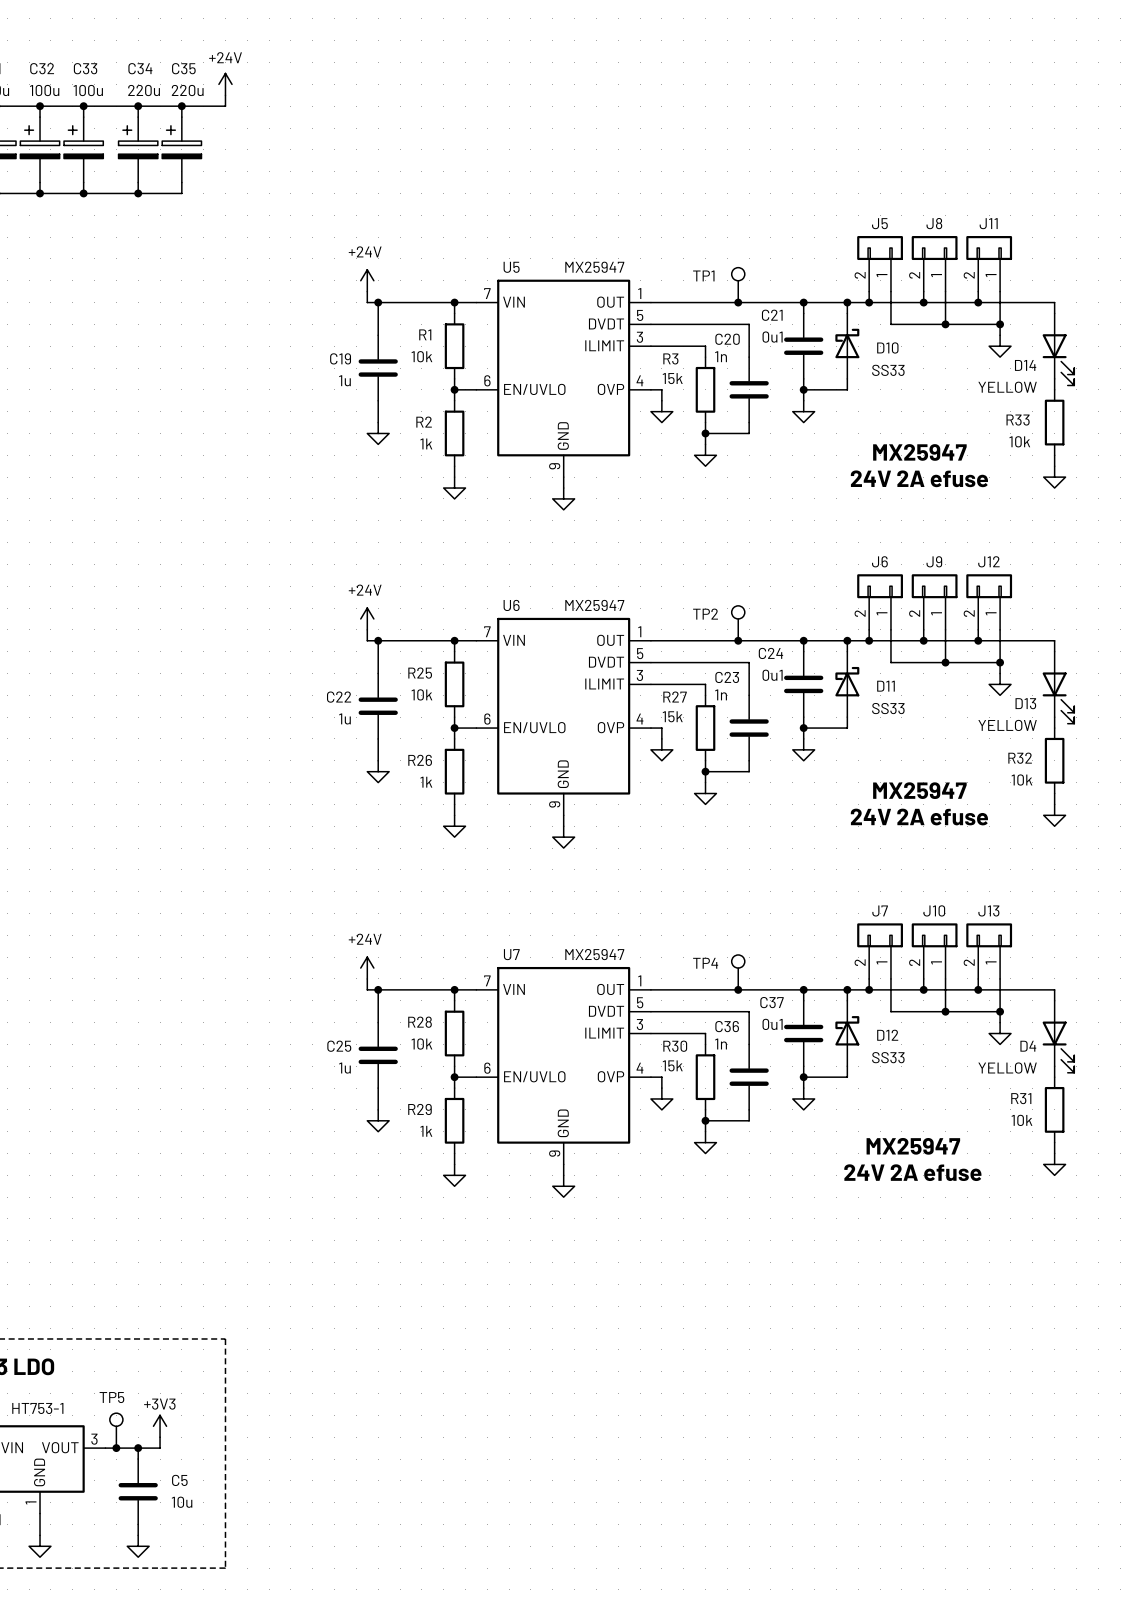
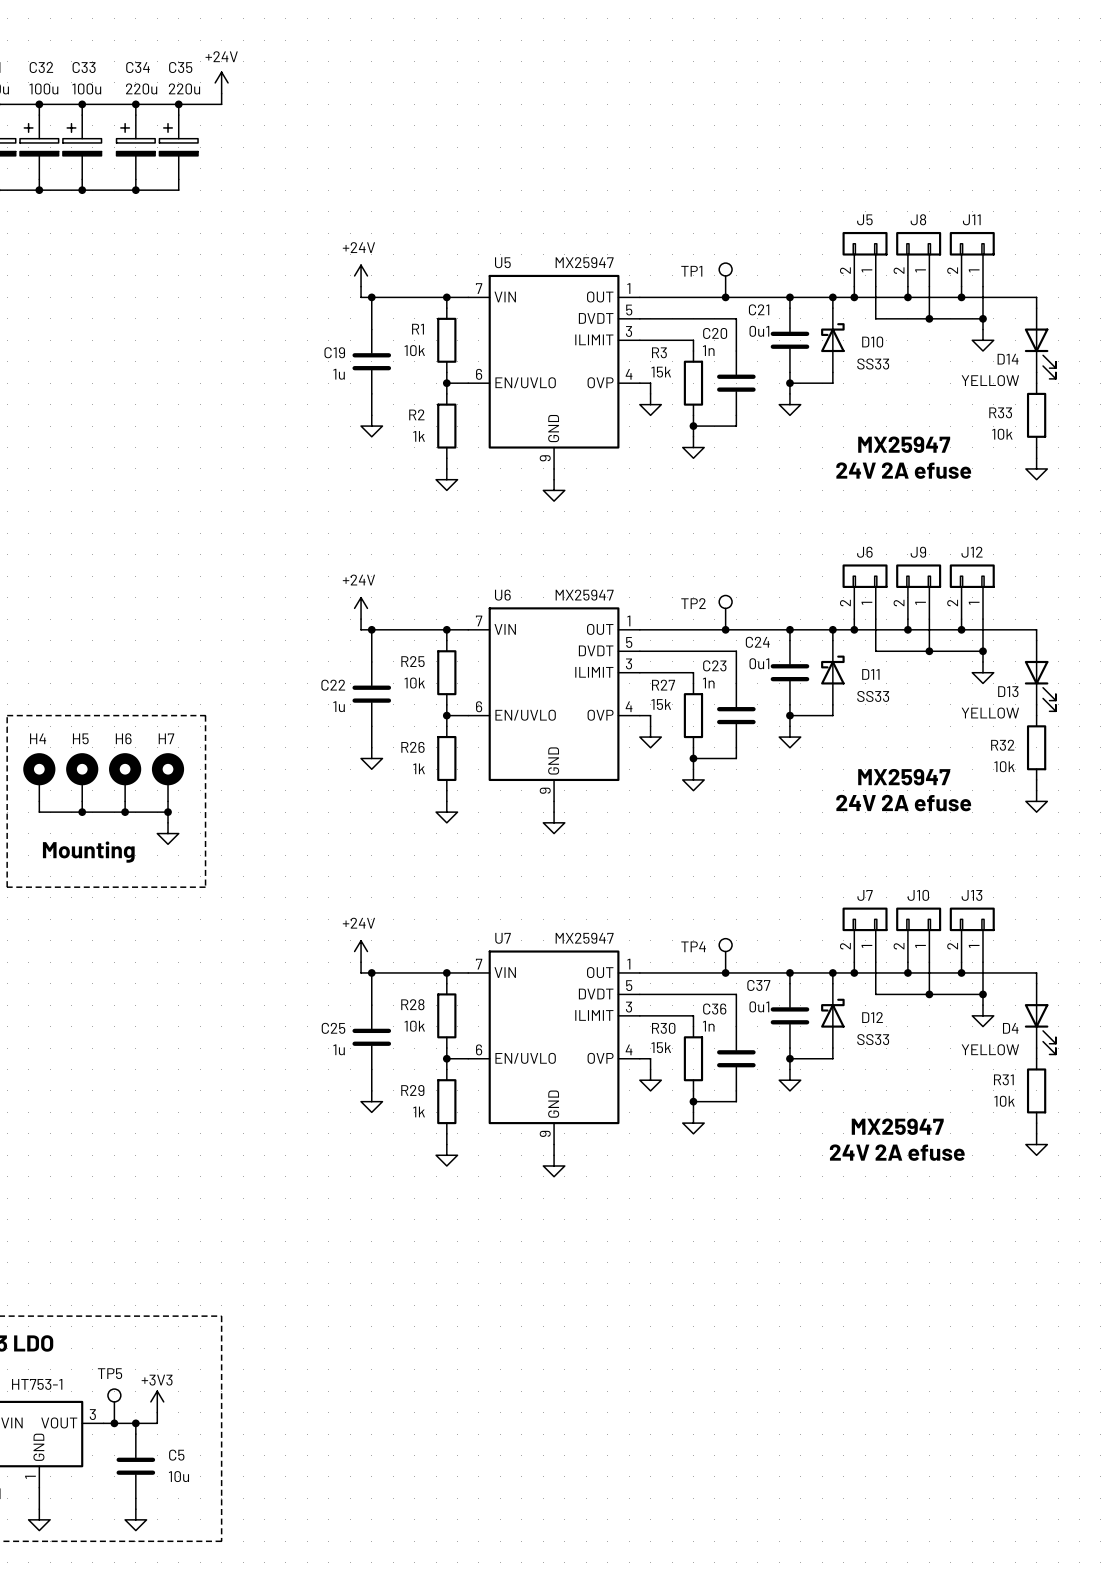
line: none -> (7, 715) (205, 715) (205, 887) (7, 887) (7, 715)
H4: none -> (39, 777)
H5: none -> (82, 777)
H6: none -> (125, 777)
H7: none -> (168, 777)
wire: none -> (39, 801) (39, 812) (168, 812)
wire: none -> (82, 801) (82, 812)
wire: none -> (125, 801) (125, 812)
wire: none -> (168, 801) (168, 822)
junction: none -> (82, 812)
junction: none -> (125, 812)
junction: none -> (168, 812)
power symbol: none -> (168, 833)
text: none -> Mounting (88, 852)

